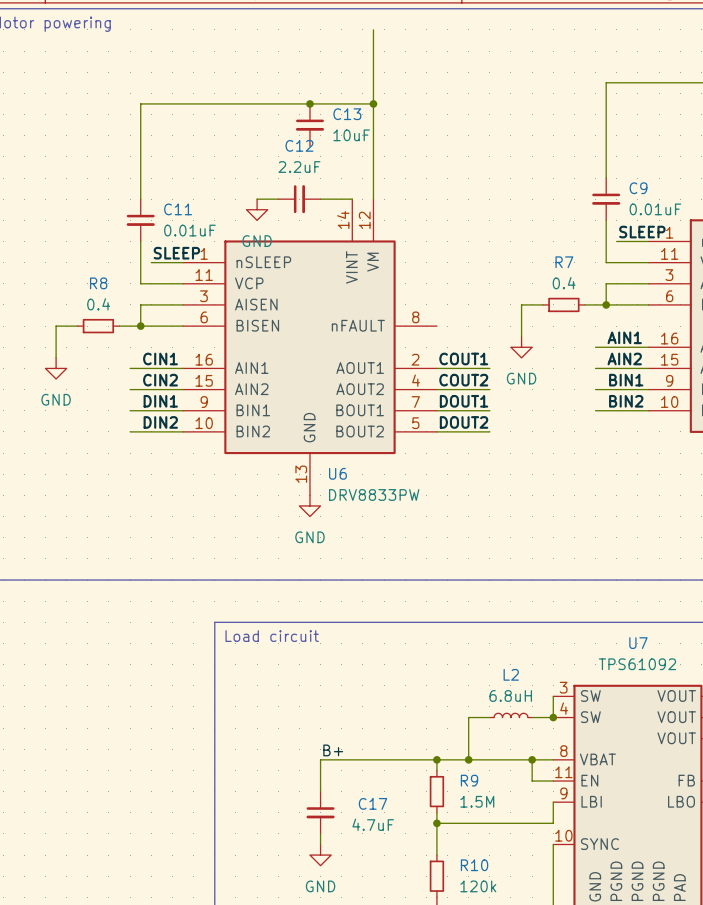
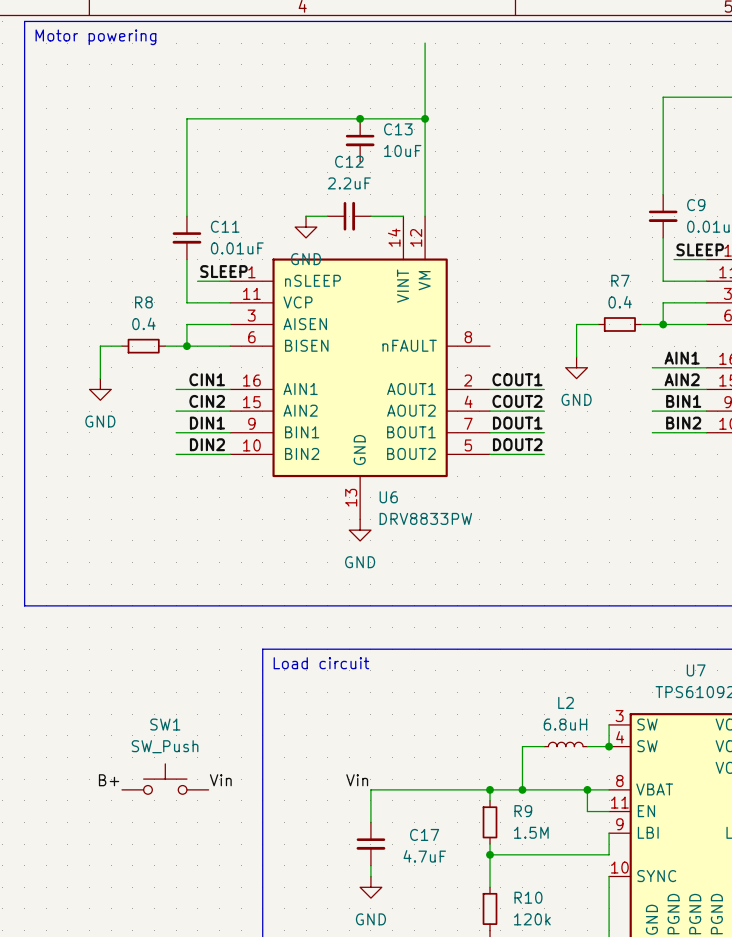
SW1: none -> SW_Push (165, 779)
label: none -> B+ (109, 780)
label: none -> Vin (220, 780)
label: B+ (333, 750) -> Vin (357, 780)

